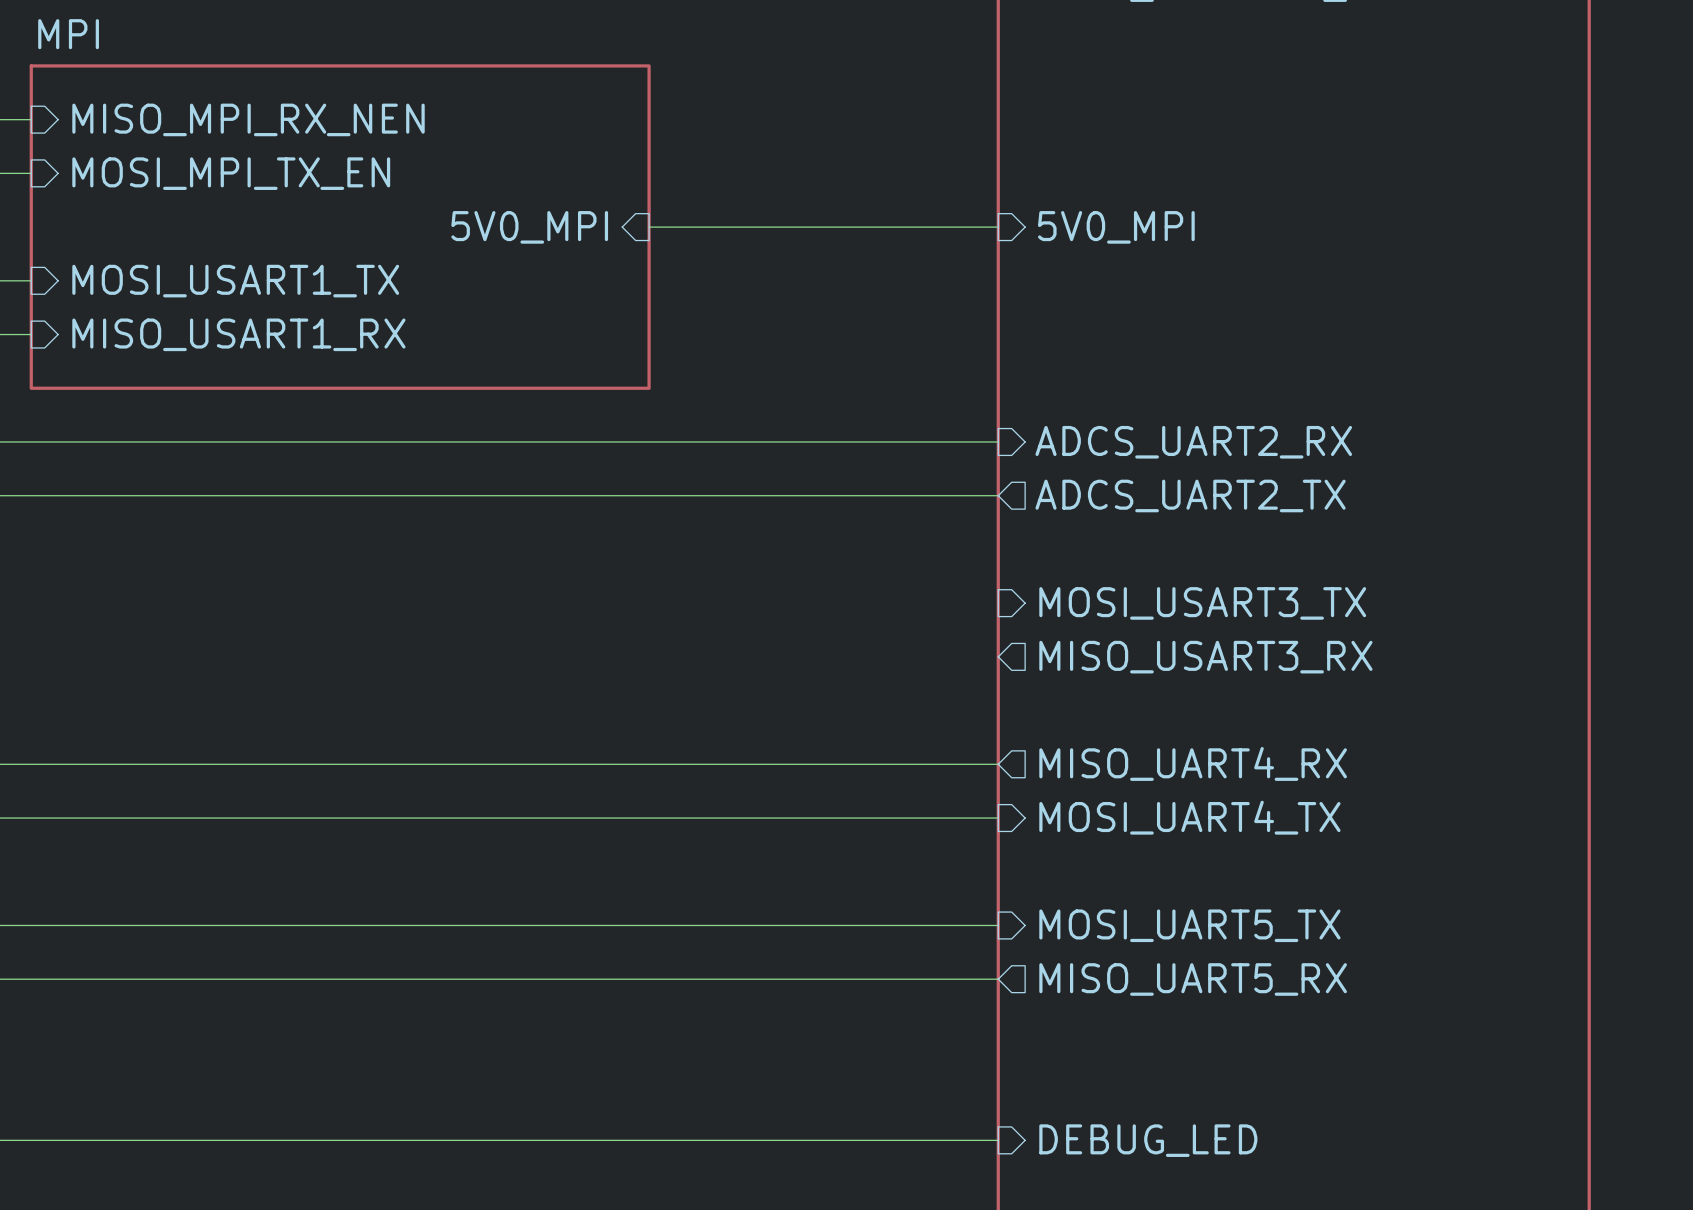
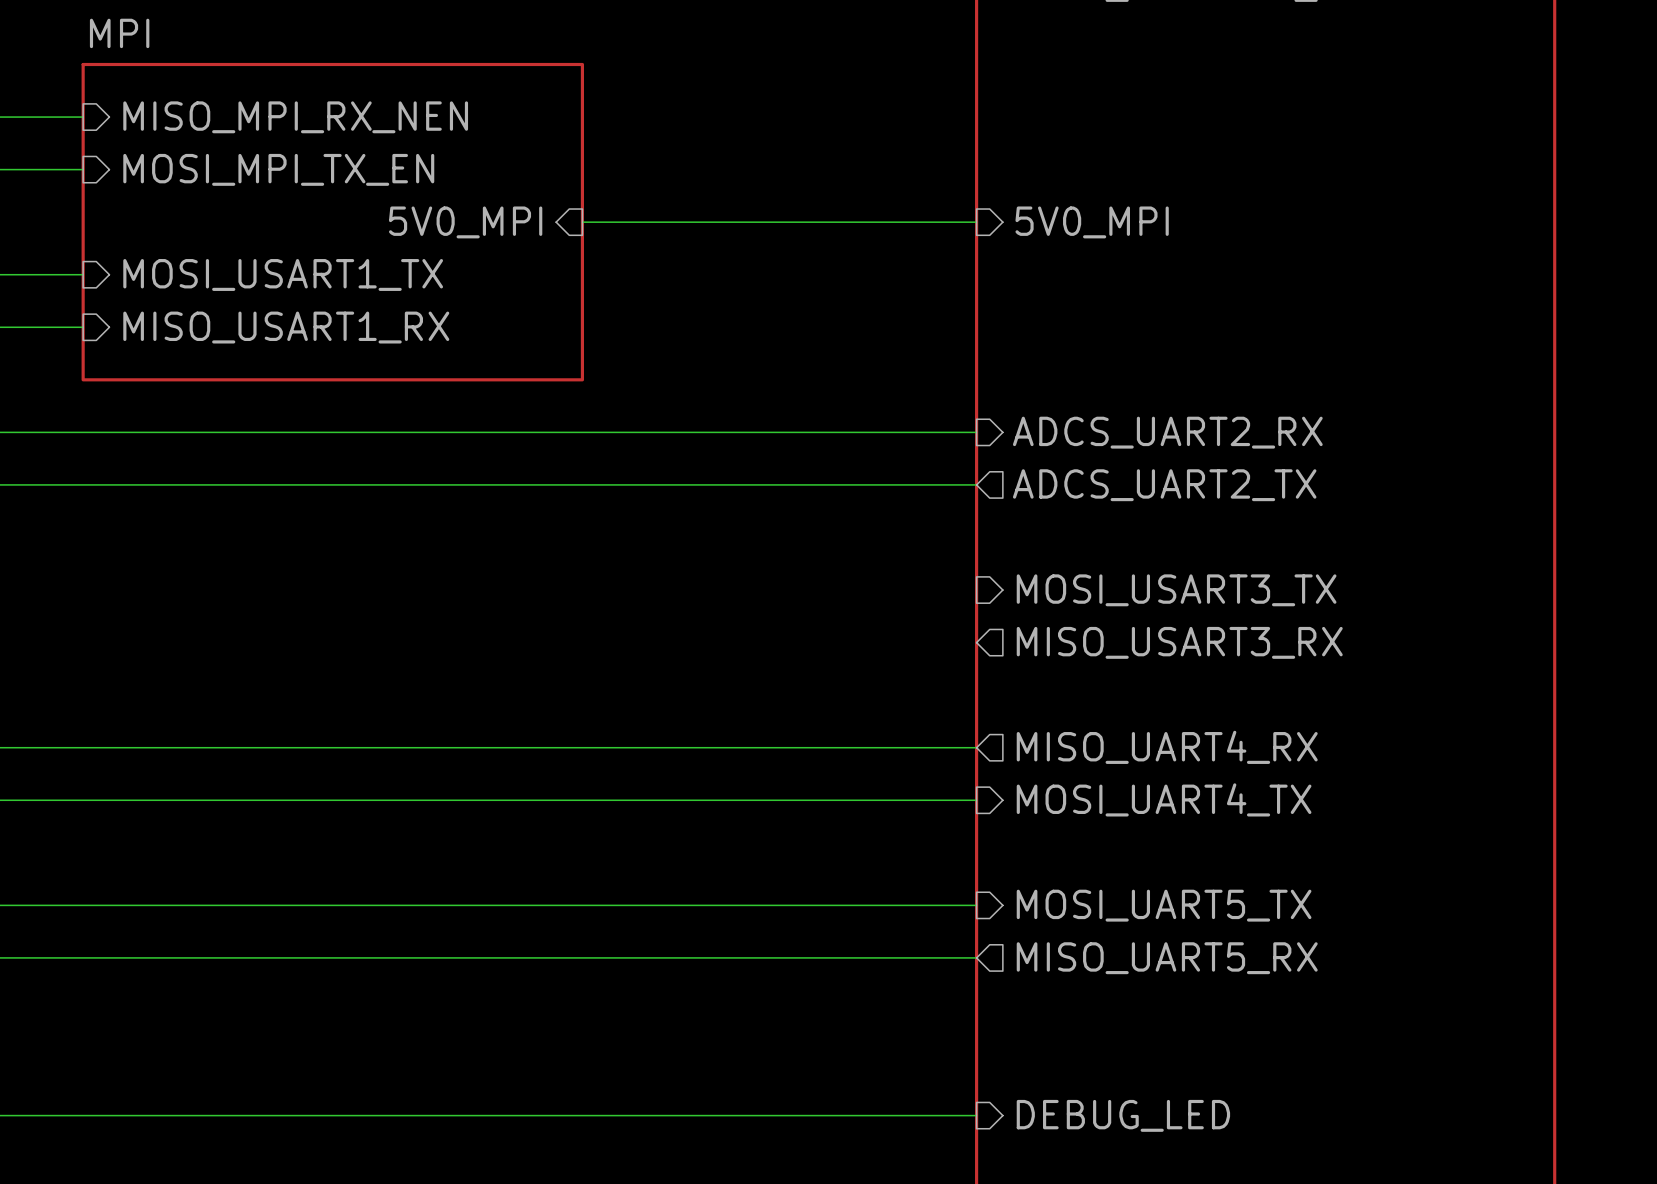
sheet MPI name position: MPI (68, 34) -> MPI (119, 33)
sheet MPI shape: [29, 64, 651, 390] -> [81, 62, 585, 382]
wire: none -> (30, 117) (83, 117)
sheet pin position: MISO_MPI_RX_NEN (248, 119) -> MISO_MPI_RX_NEN (295, 117)
wire: none -> (30, 169) (83, 169)
sheet pin position: MOSI_MPI_TX_EN (231, 173) -> MOSI_MPI_TX_EN (278, 169)
sheet pin position: 5V0_MPI (529, 227) -> 5V0_MPI (465, 222)
wire: none -> (582, 222) (634, 222)
wire: none -> (30, 274) (83, 274)
sheet pin position: MOSI_USART1_TX (235, 281) -> MOSI_USART1_TX (283, 274)
wire: none -> (30, 327) (83, 327)
sheet pin position: MISO_USART1_RX (238, 334) -> MISO_USART1_RX (286, 327)

